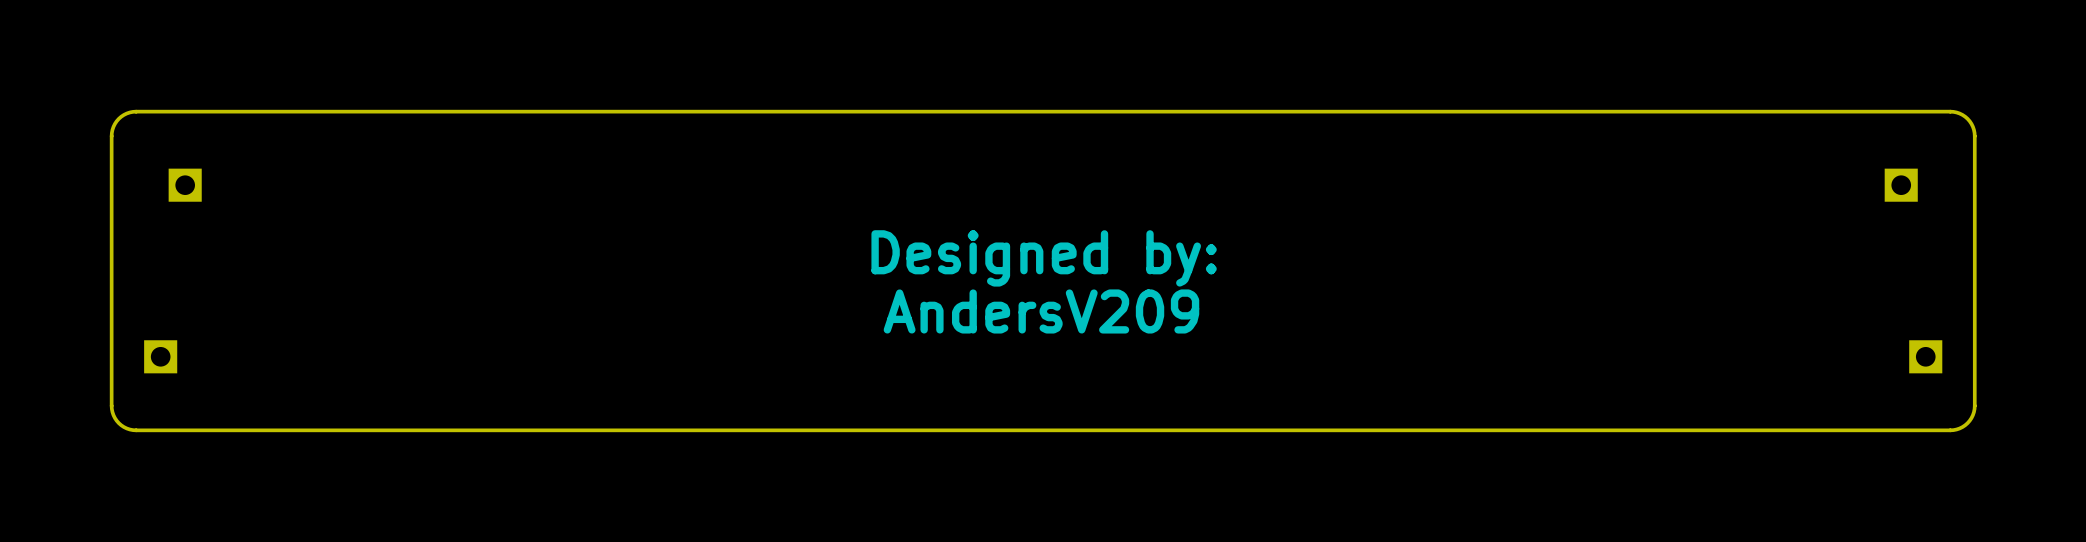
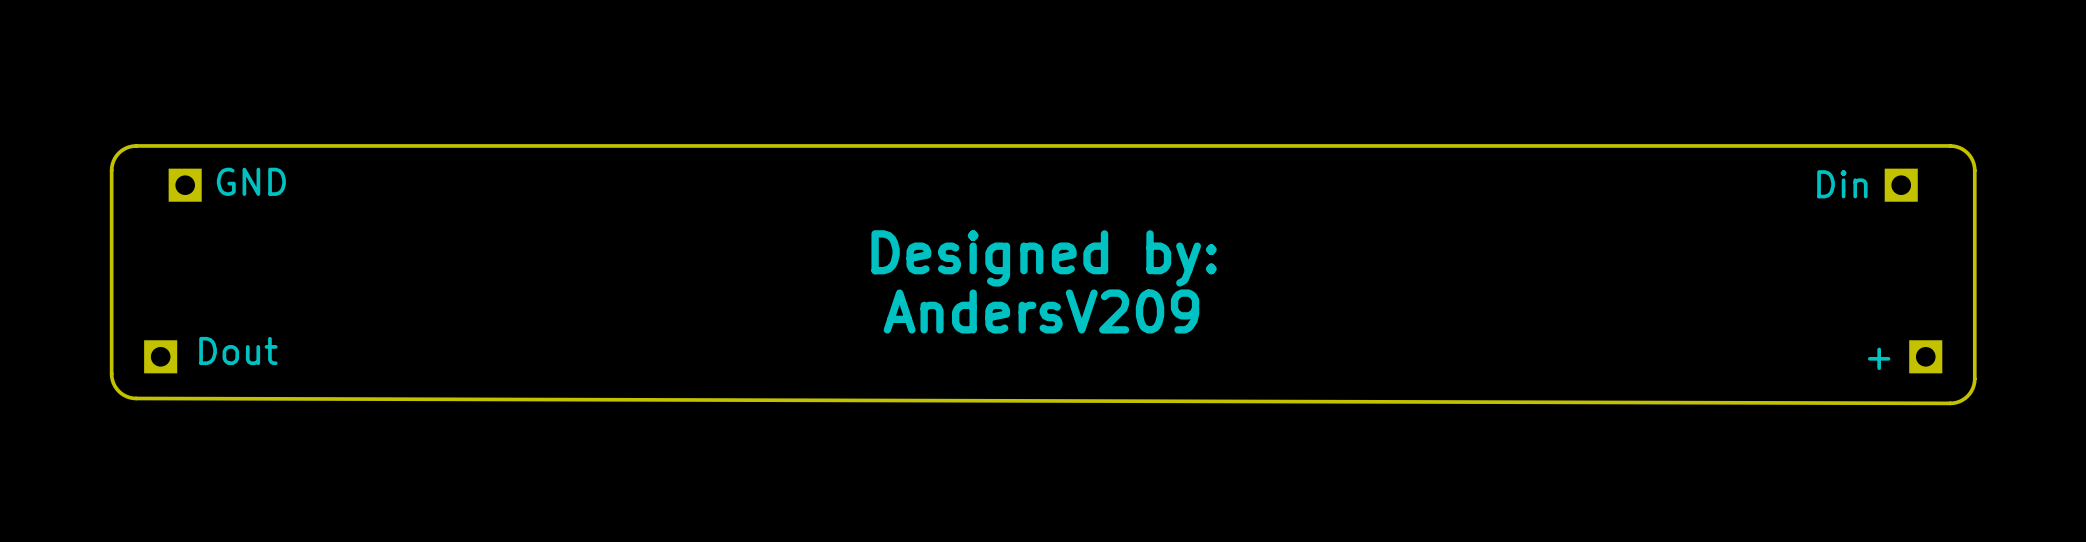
board edge: (1974, 170) (1972, 126) (1965, 116) (1950, 111) (136, 111) (121, 116) (113, 126) (111, 170) -> (1974, 170) (1972, 161) (1967, 153) (1959, 147) (1950, 145) (136, 145) (126, 147) (118, 153) (113, 161) (111, 170)
part value: none -> GND (251, 181)
part value: none -> Din (1842, 184)
part value: none -> Dout (238, 350)
part value: none -> + (1879, 358)
board edge: (111, 373) (113, 415) (121, 425) (136, 430) (1950, 430) (1965, 425) (1972, 415) (1974, 378) -> (111, 373) (113, 383) (118, 391) (126, 396) (136, 398) (1950, 403) (1959, 401) (1967, 396) (1972, 388) (1974, 378)

